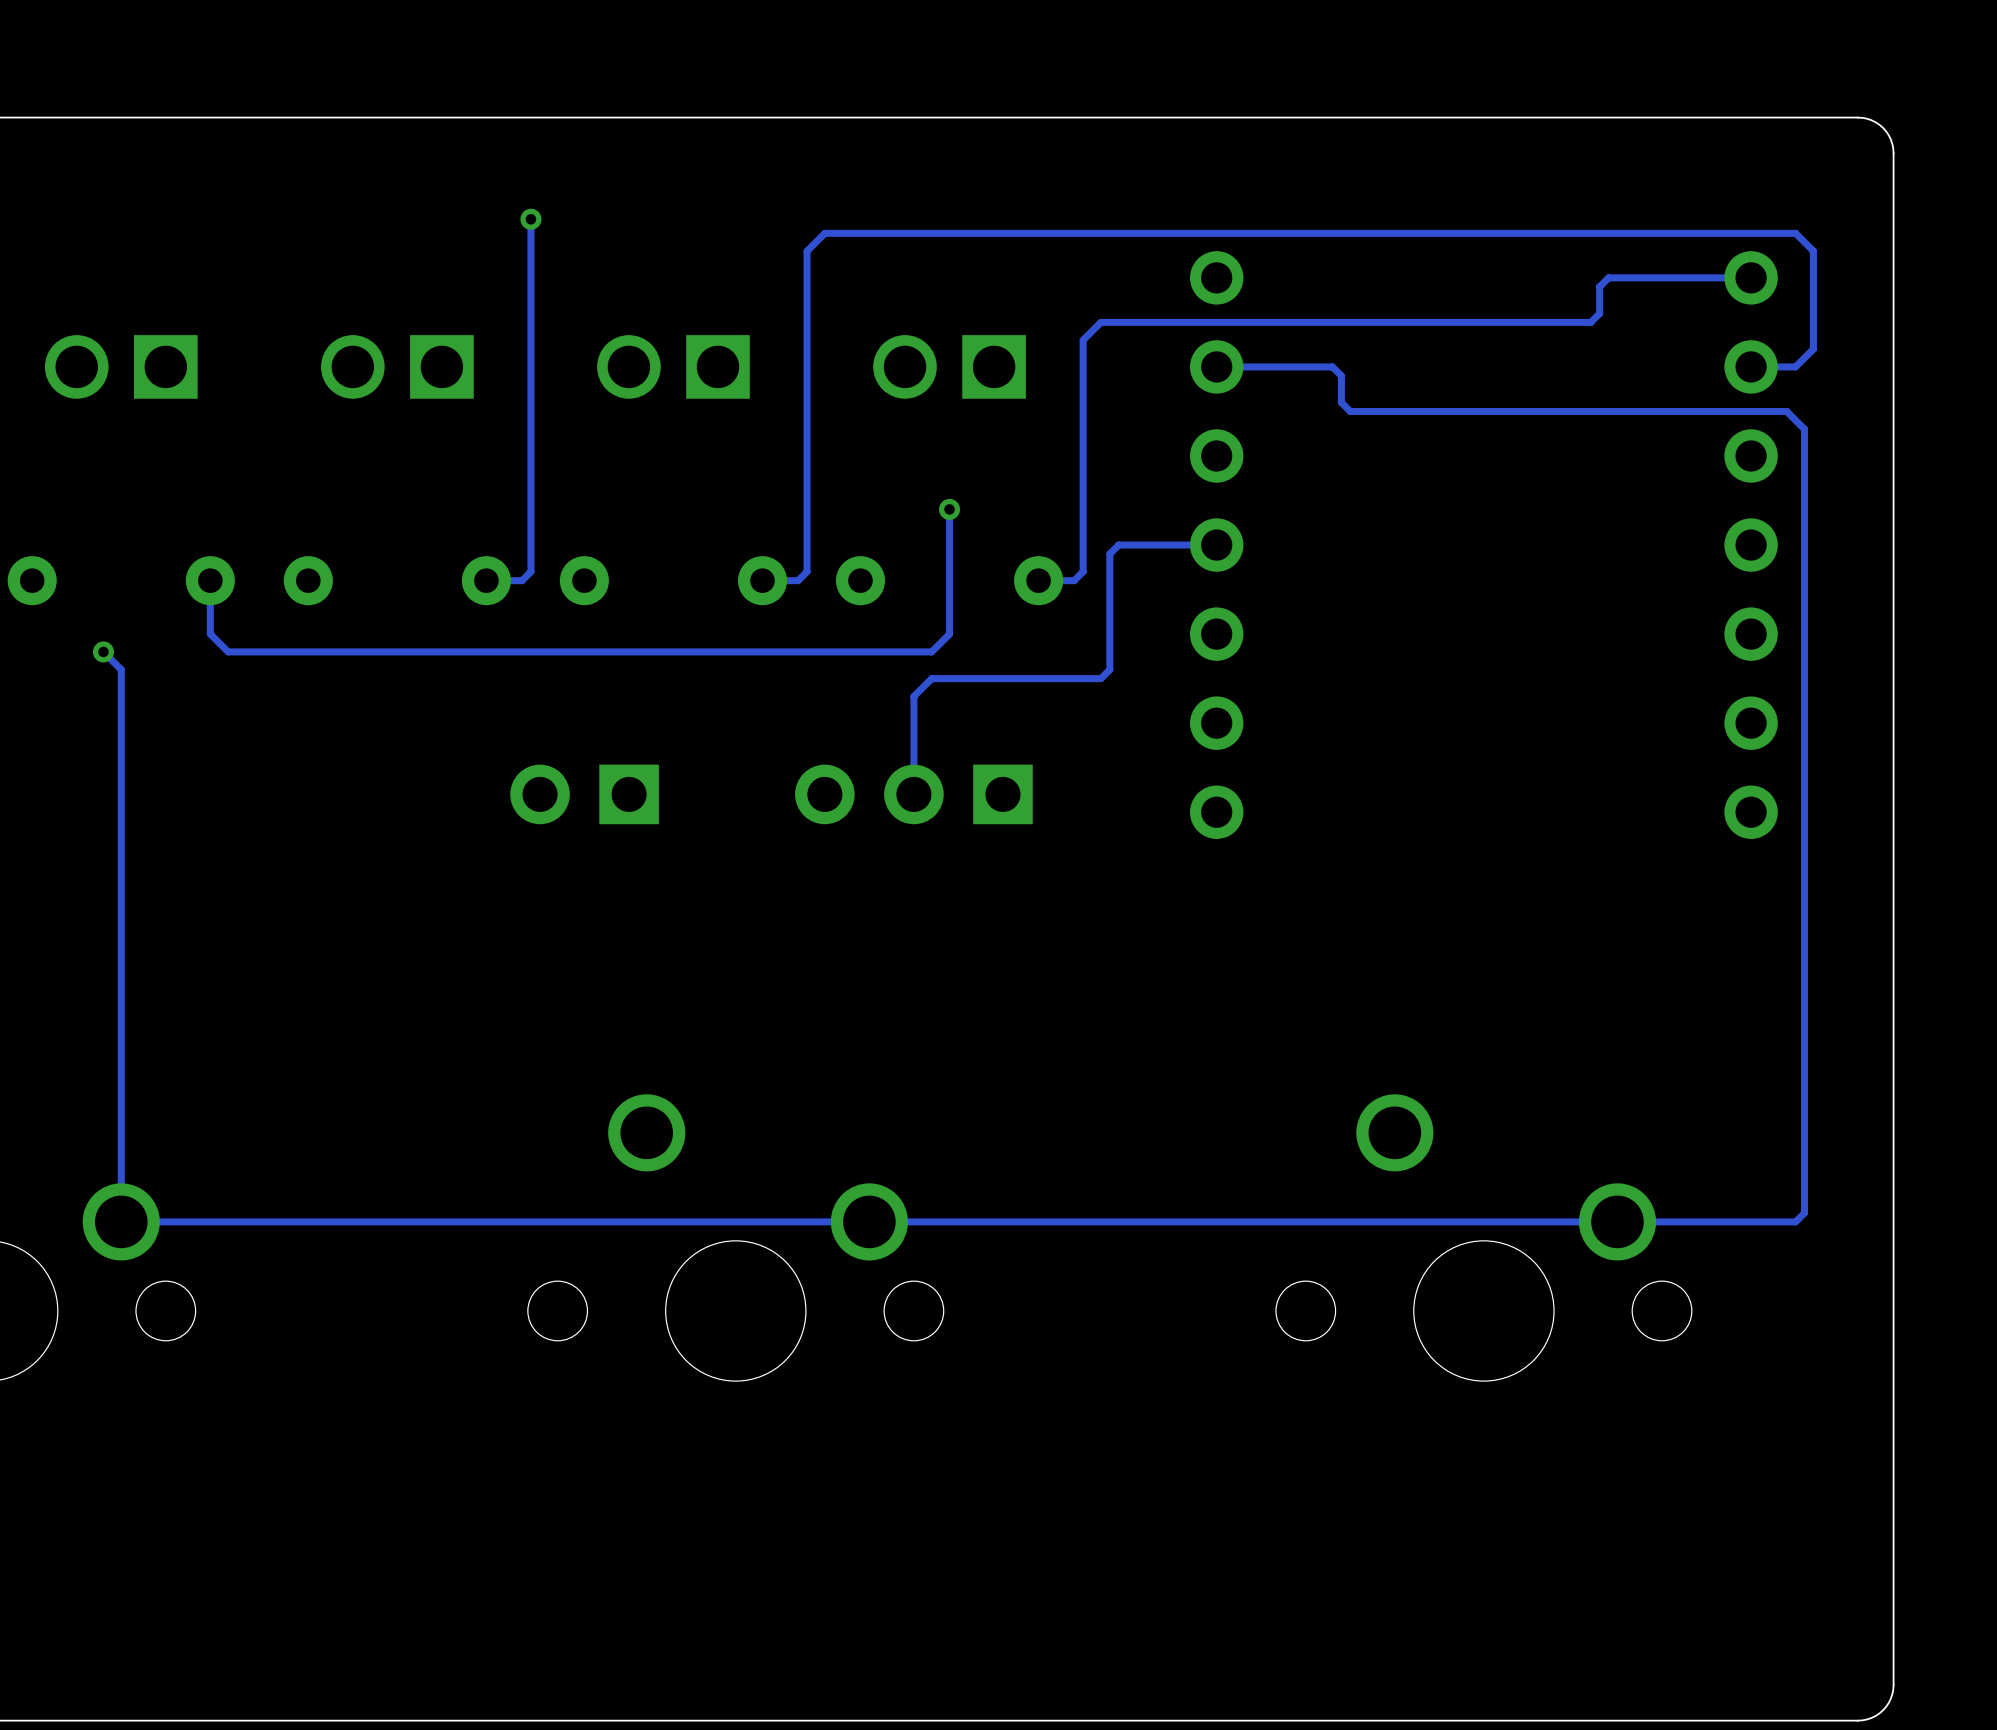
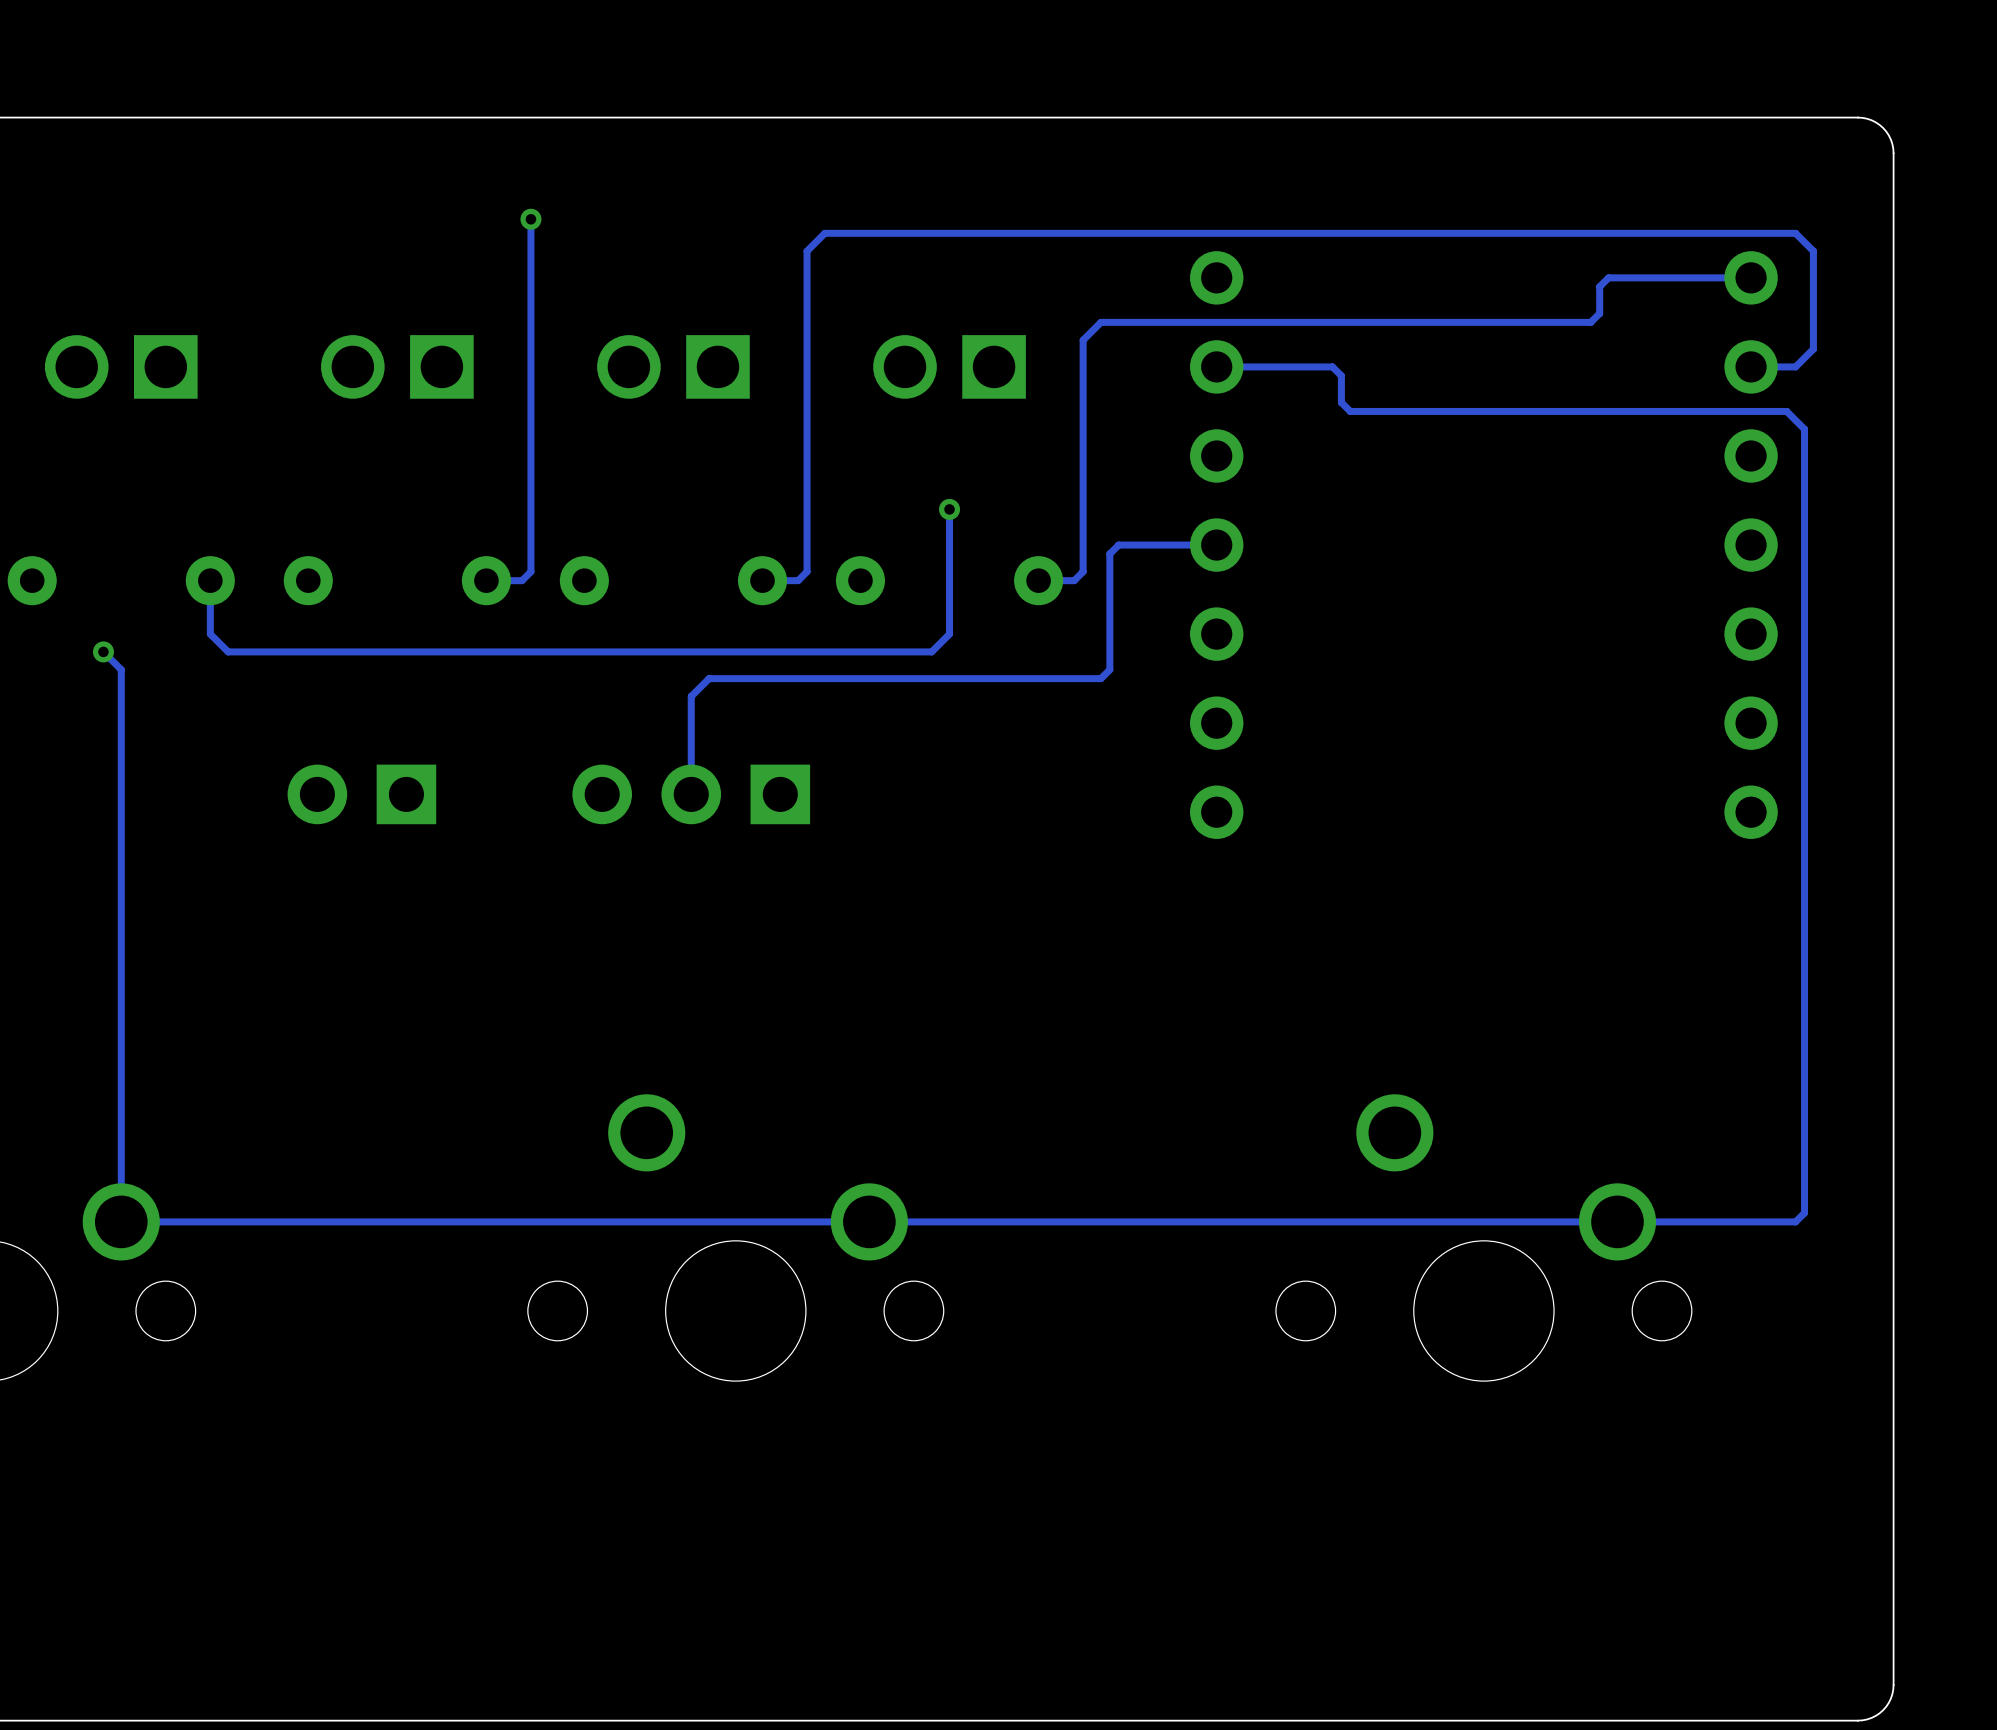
track: (931, 678) (913, 696) (913, 794) -> (931, 678) (709, 678) (691, 696) (691, 794)
part position: (584, 794) -> (361, 794)
part position: (913, 794) -> (691, 794)

